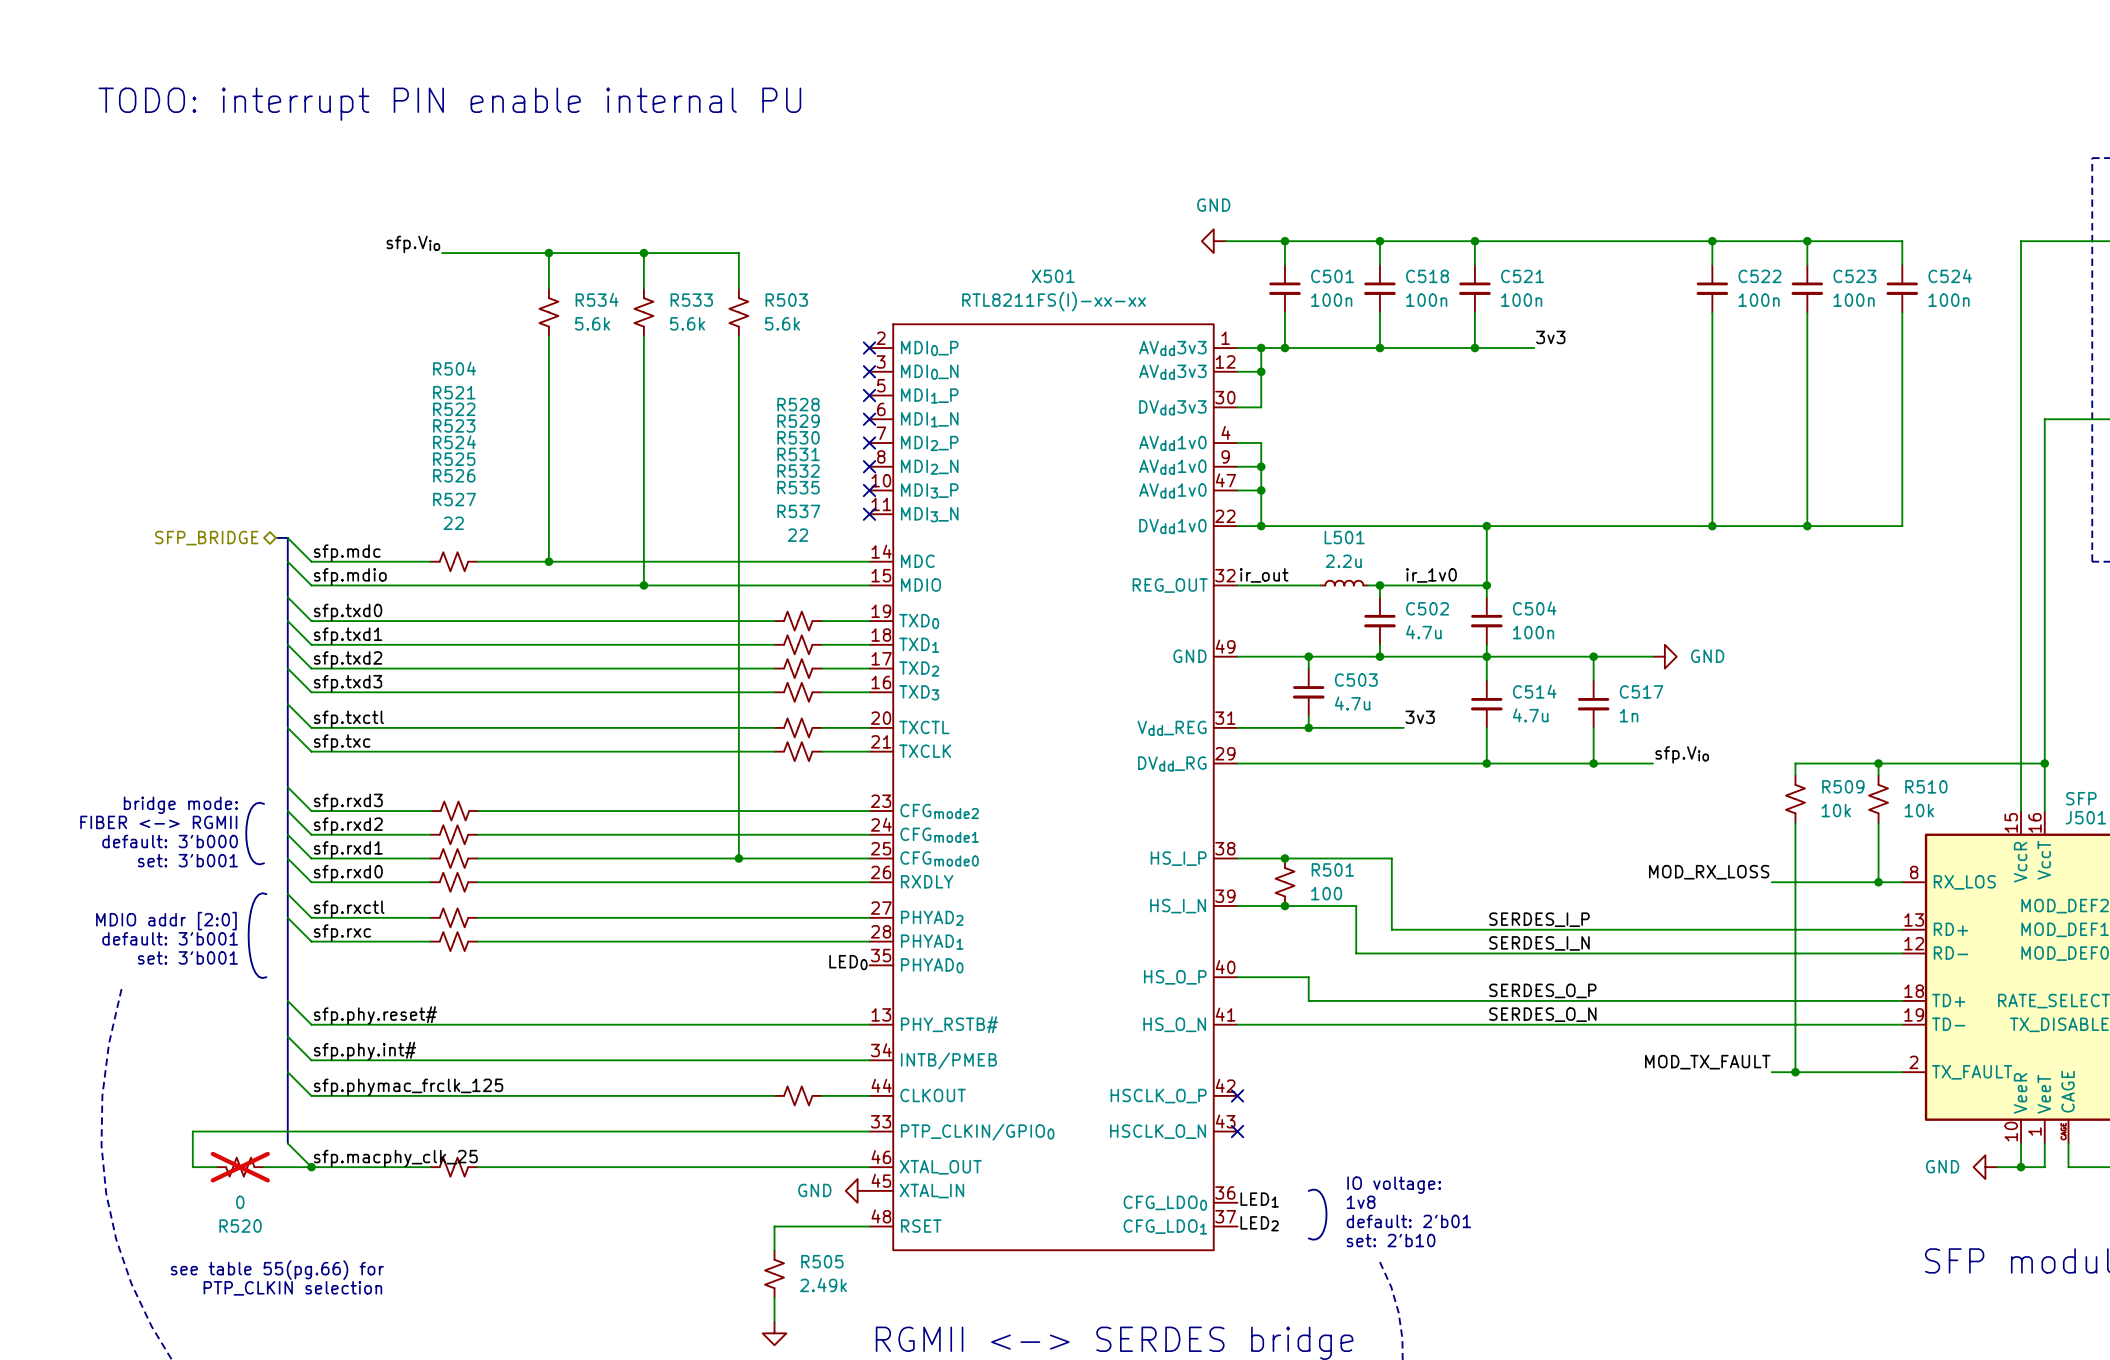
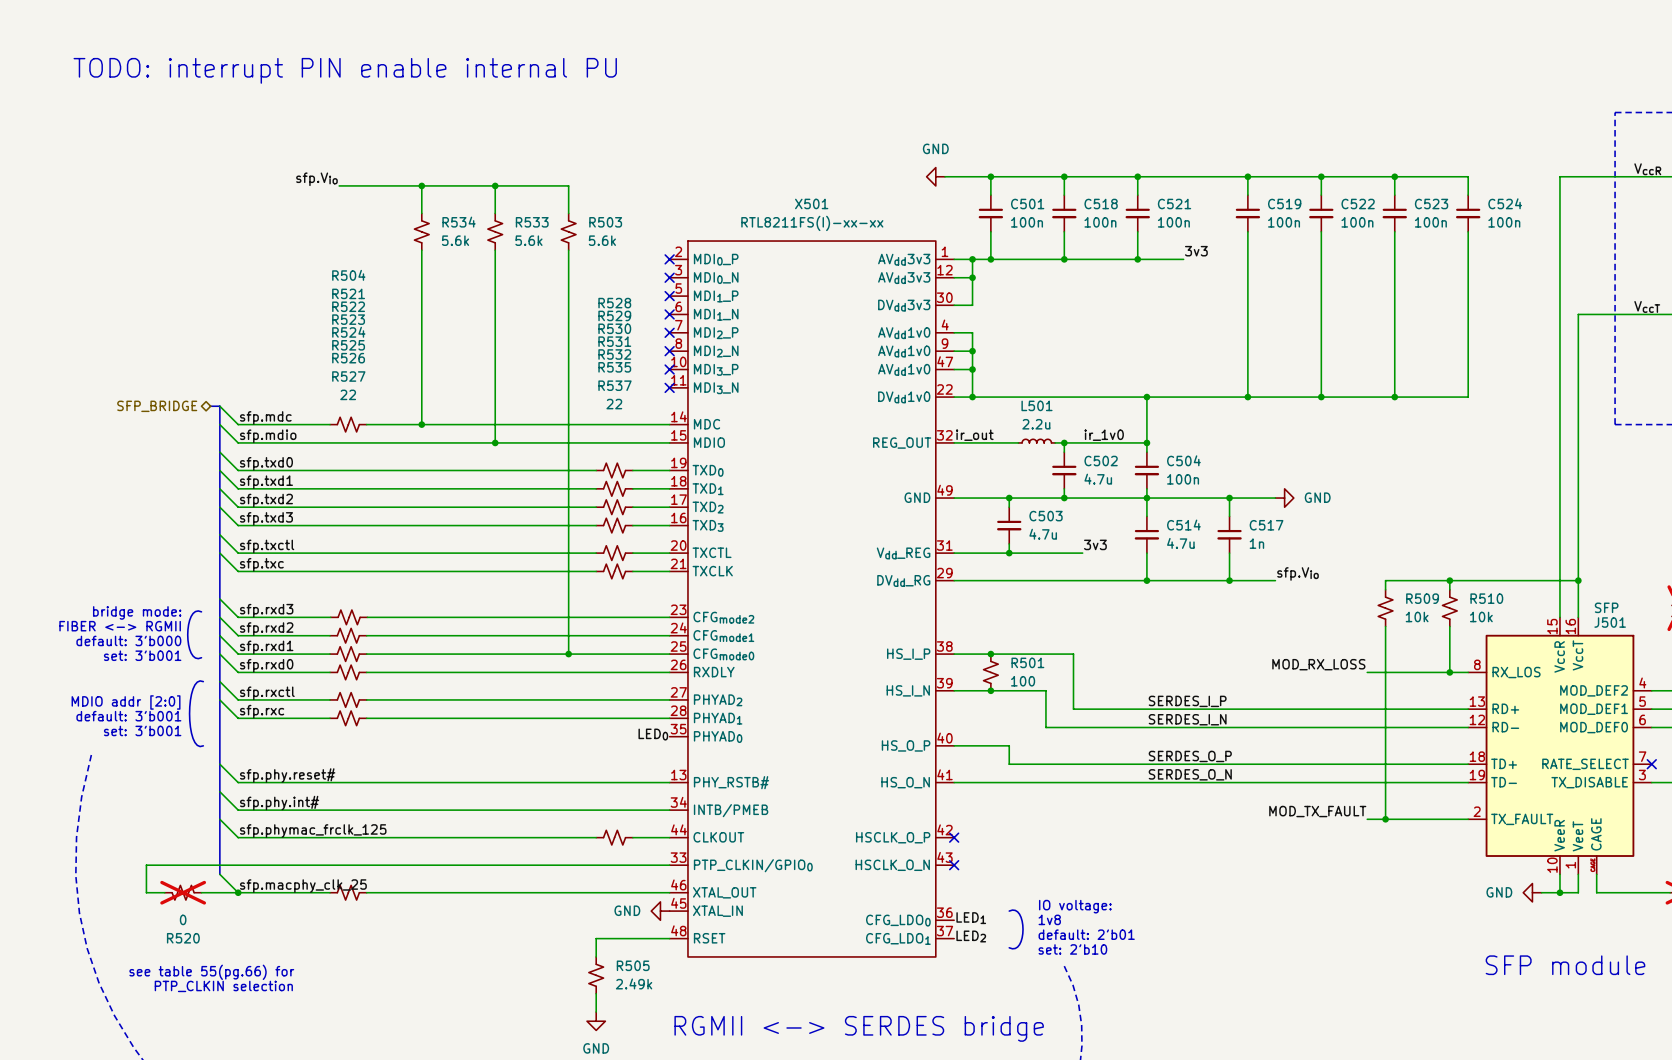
wire: none -> (1247, 176) (1247, 195)
junction: none -> (1247, 176)
C519: none -> 100n (1247, 213)
wire: none -> (1247, 231) (1247, 397)
junction: none -> (1247, 397)

